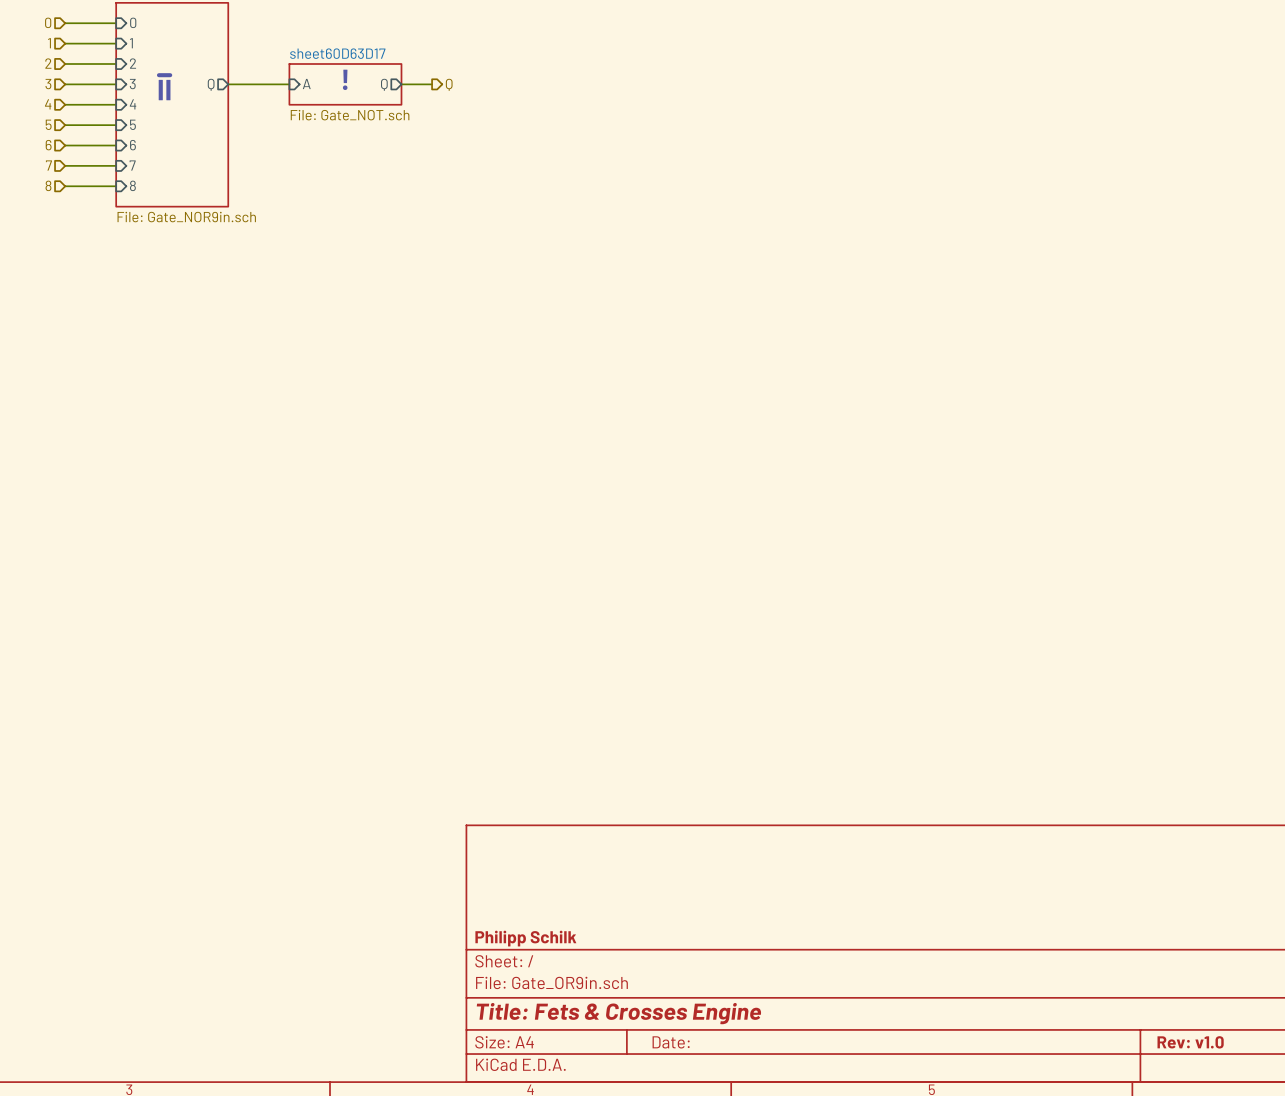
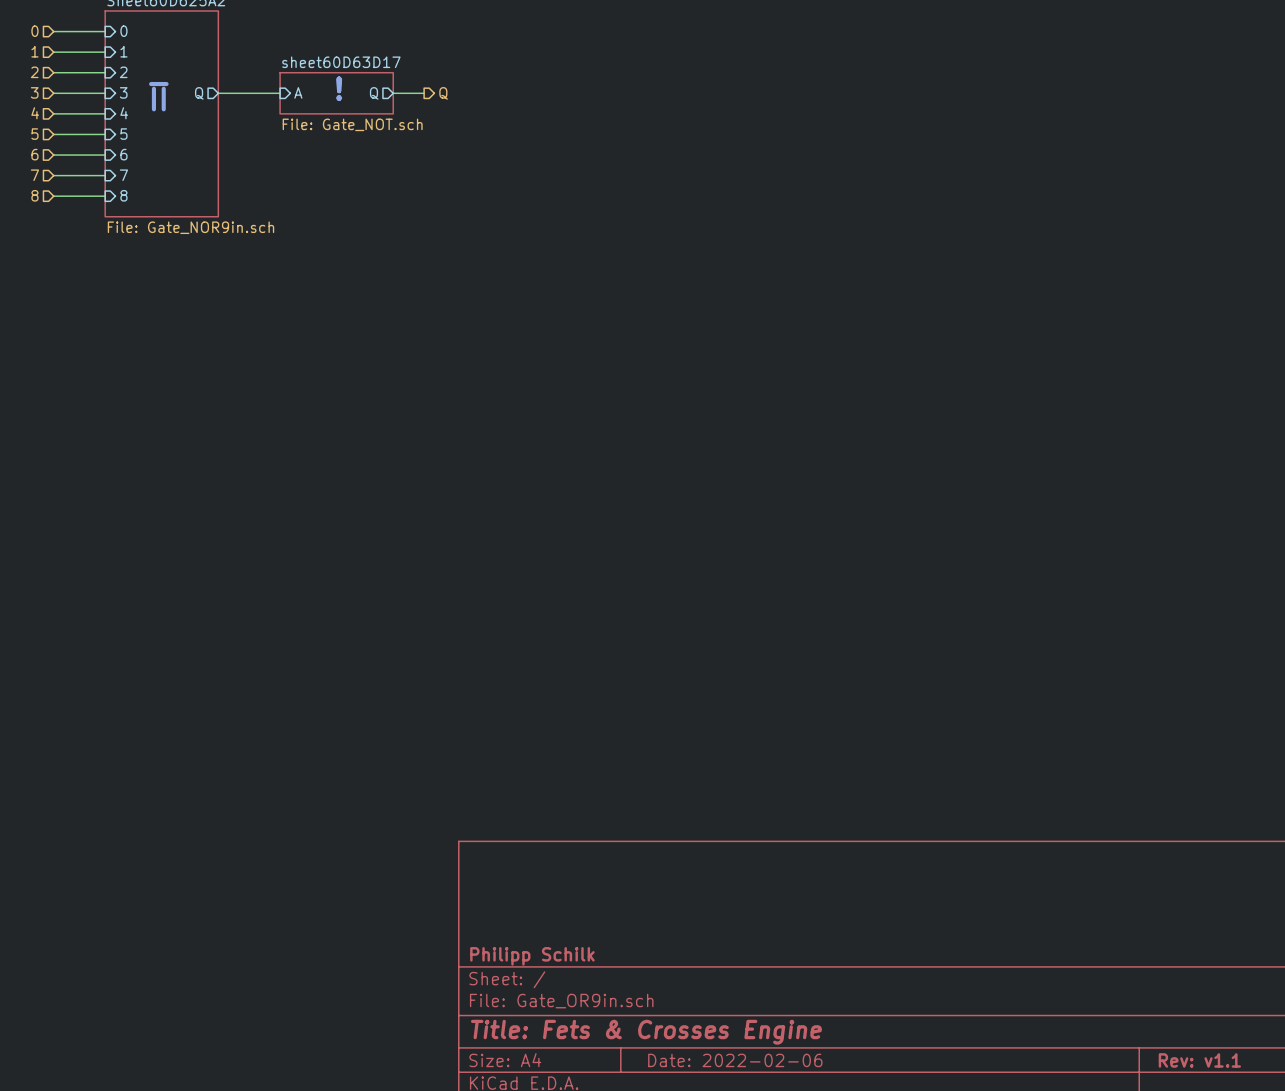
title block: Date: (671, 1042) -> Date: 2022-02-06 (735, 1060)
title block: Rev: v1.0 (1190, 1042) -> Rev: v1.1 (1199, 1060)

